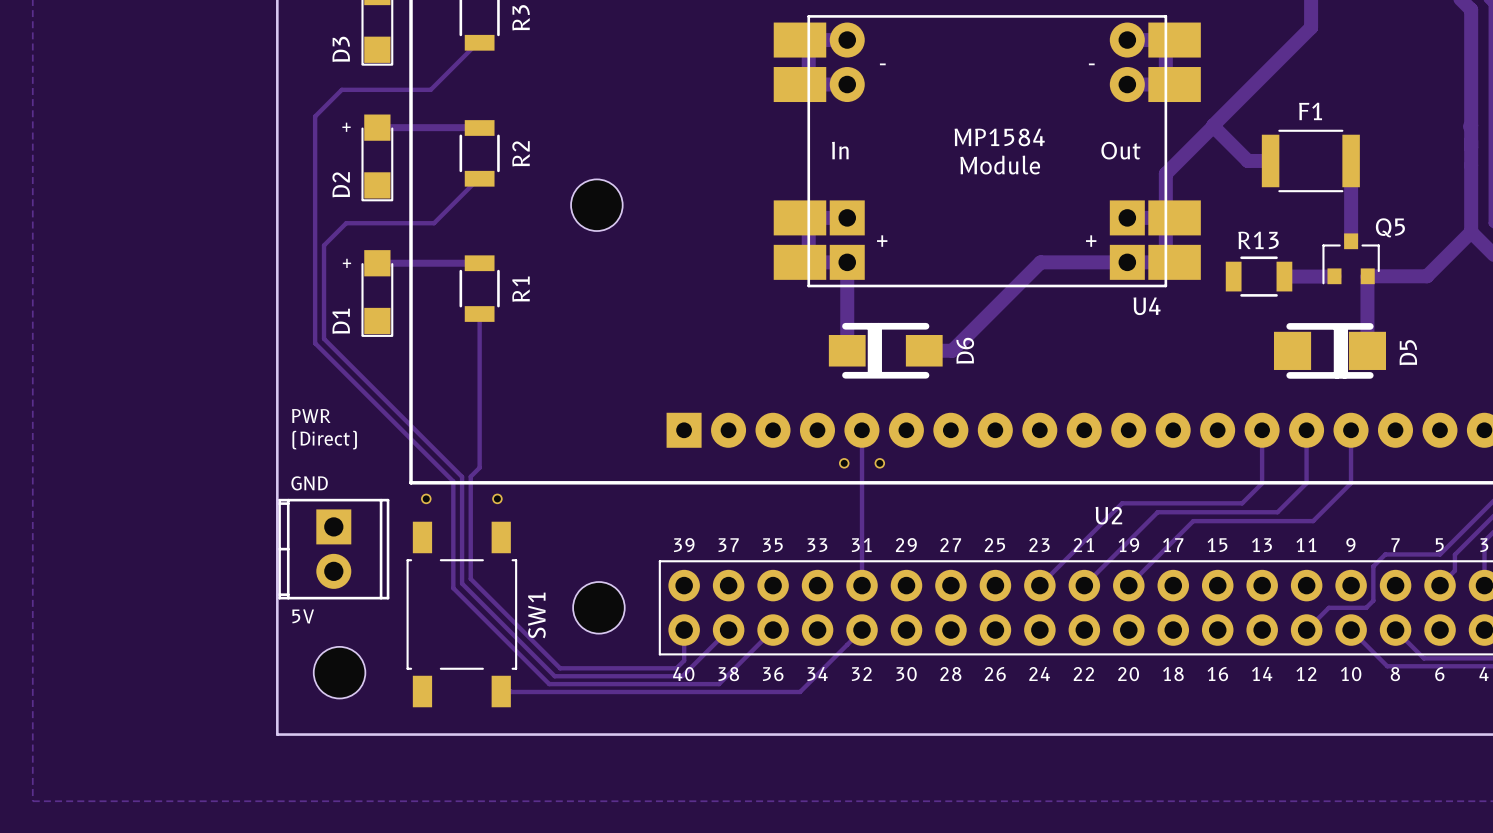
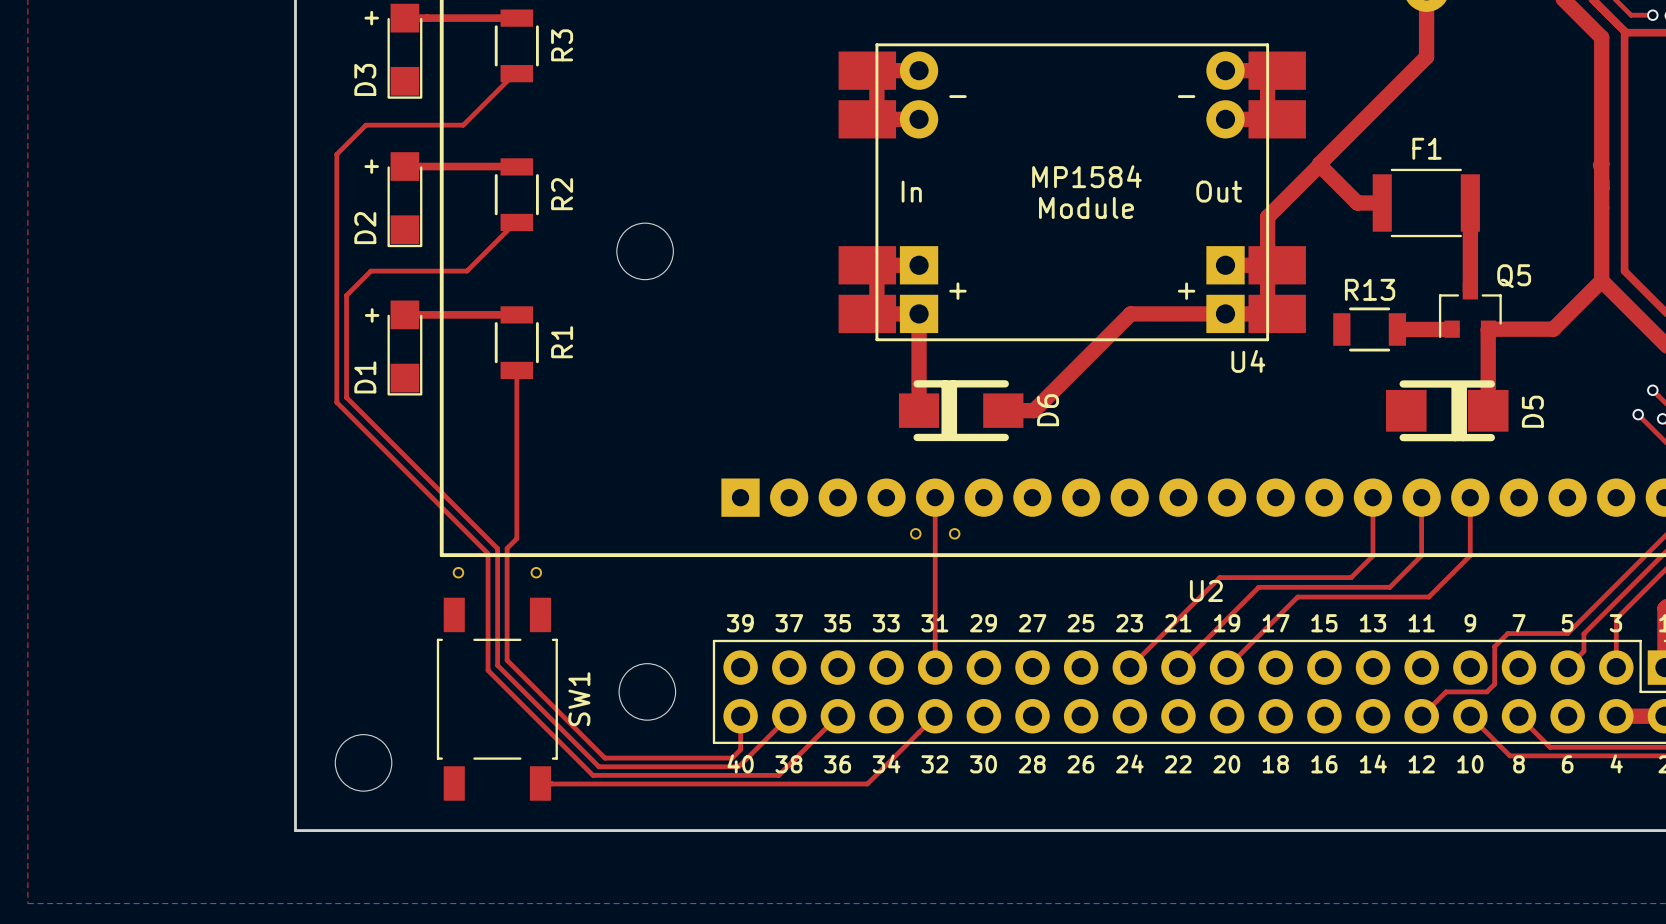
text: PWR (311, 415) -> none
text: (Direct) (324, 440) -> none
text: GND (309, 483) -> none
part: (333, 549) -> none
text: 5V (303, 616) -> none

